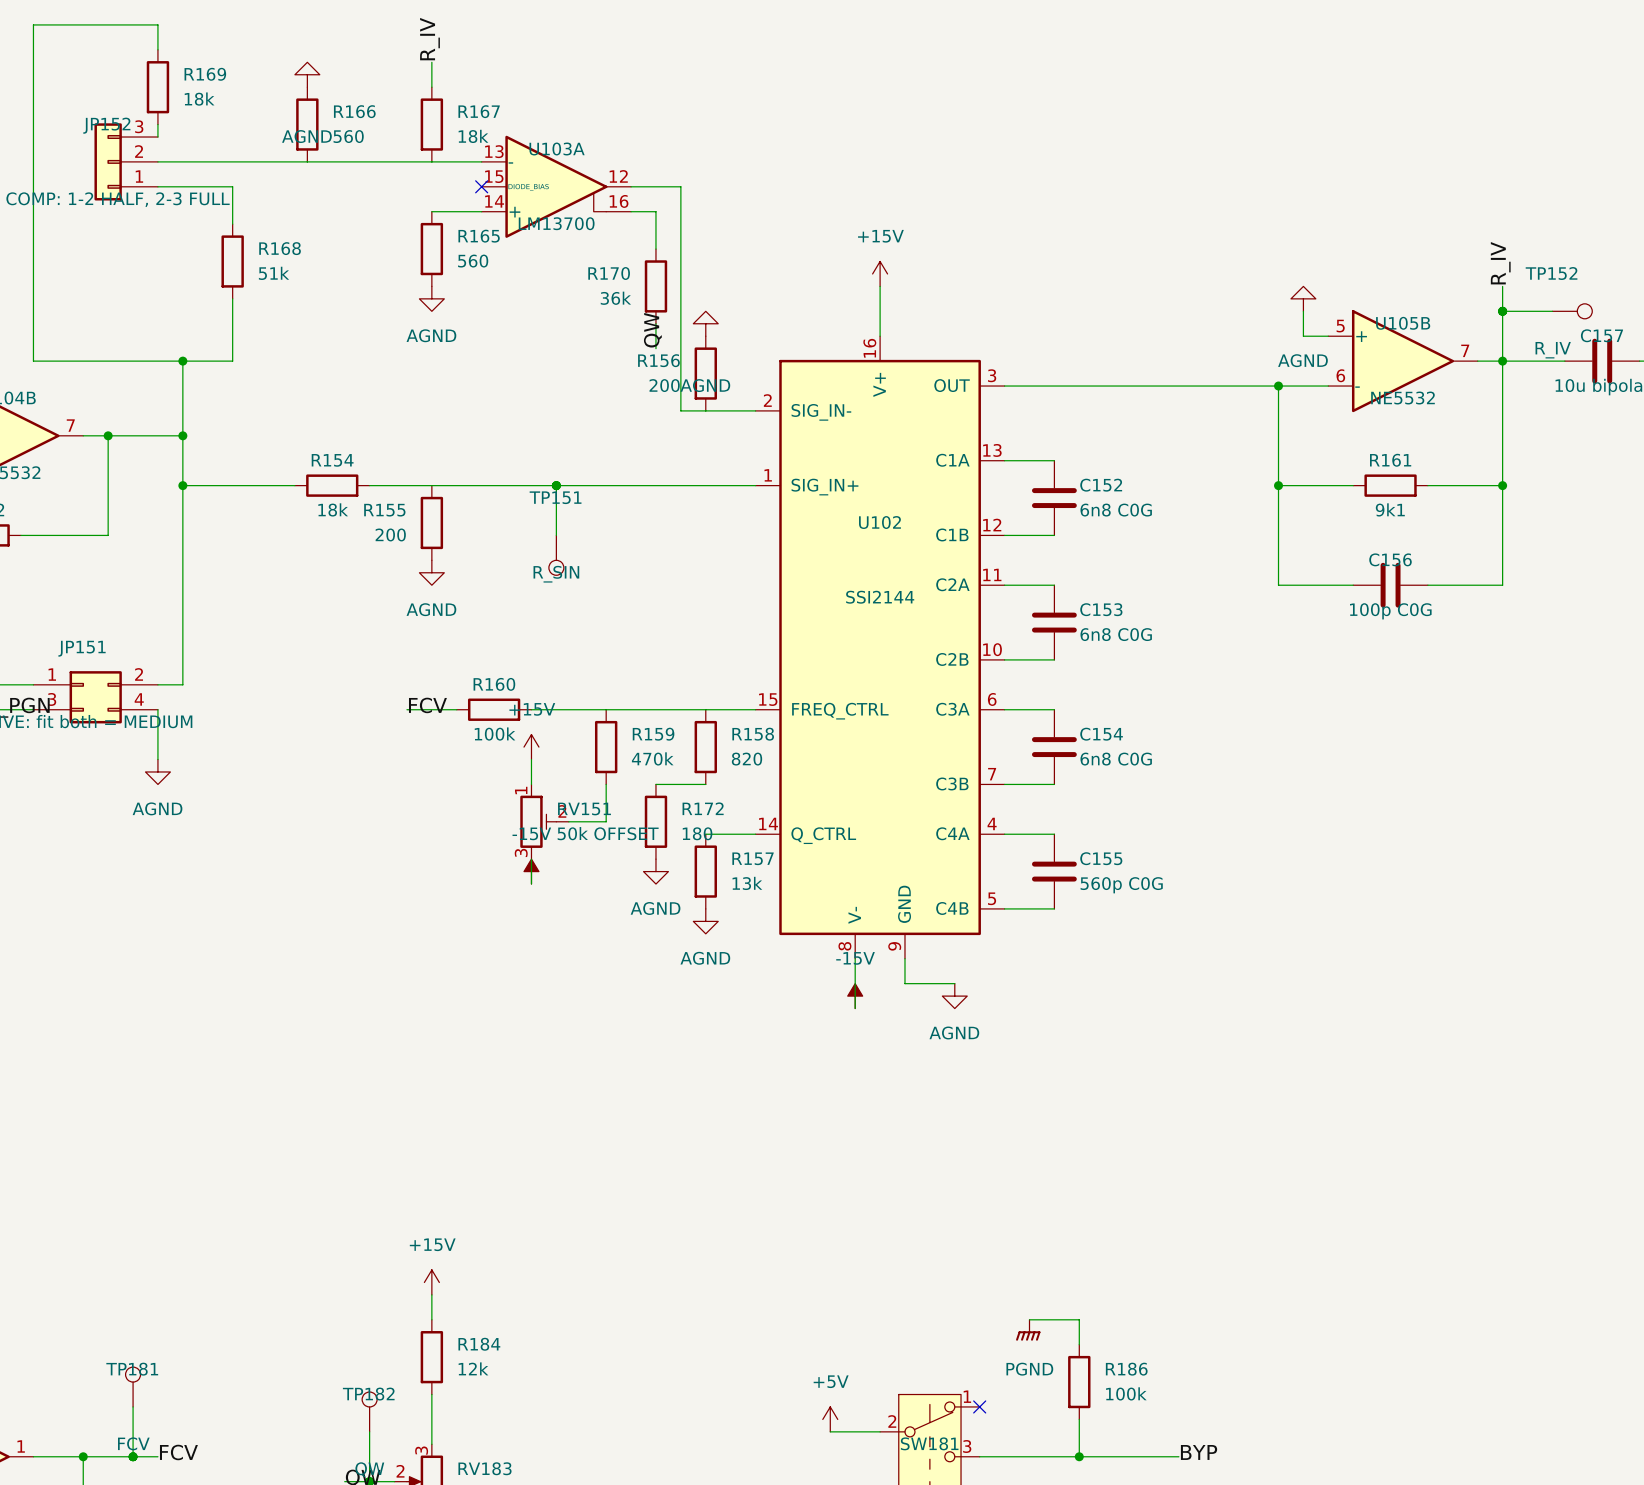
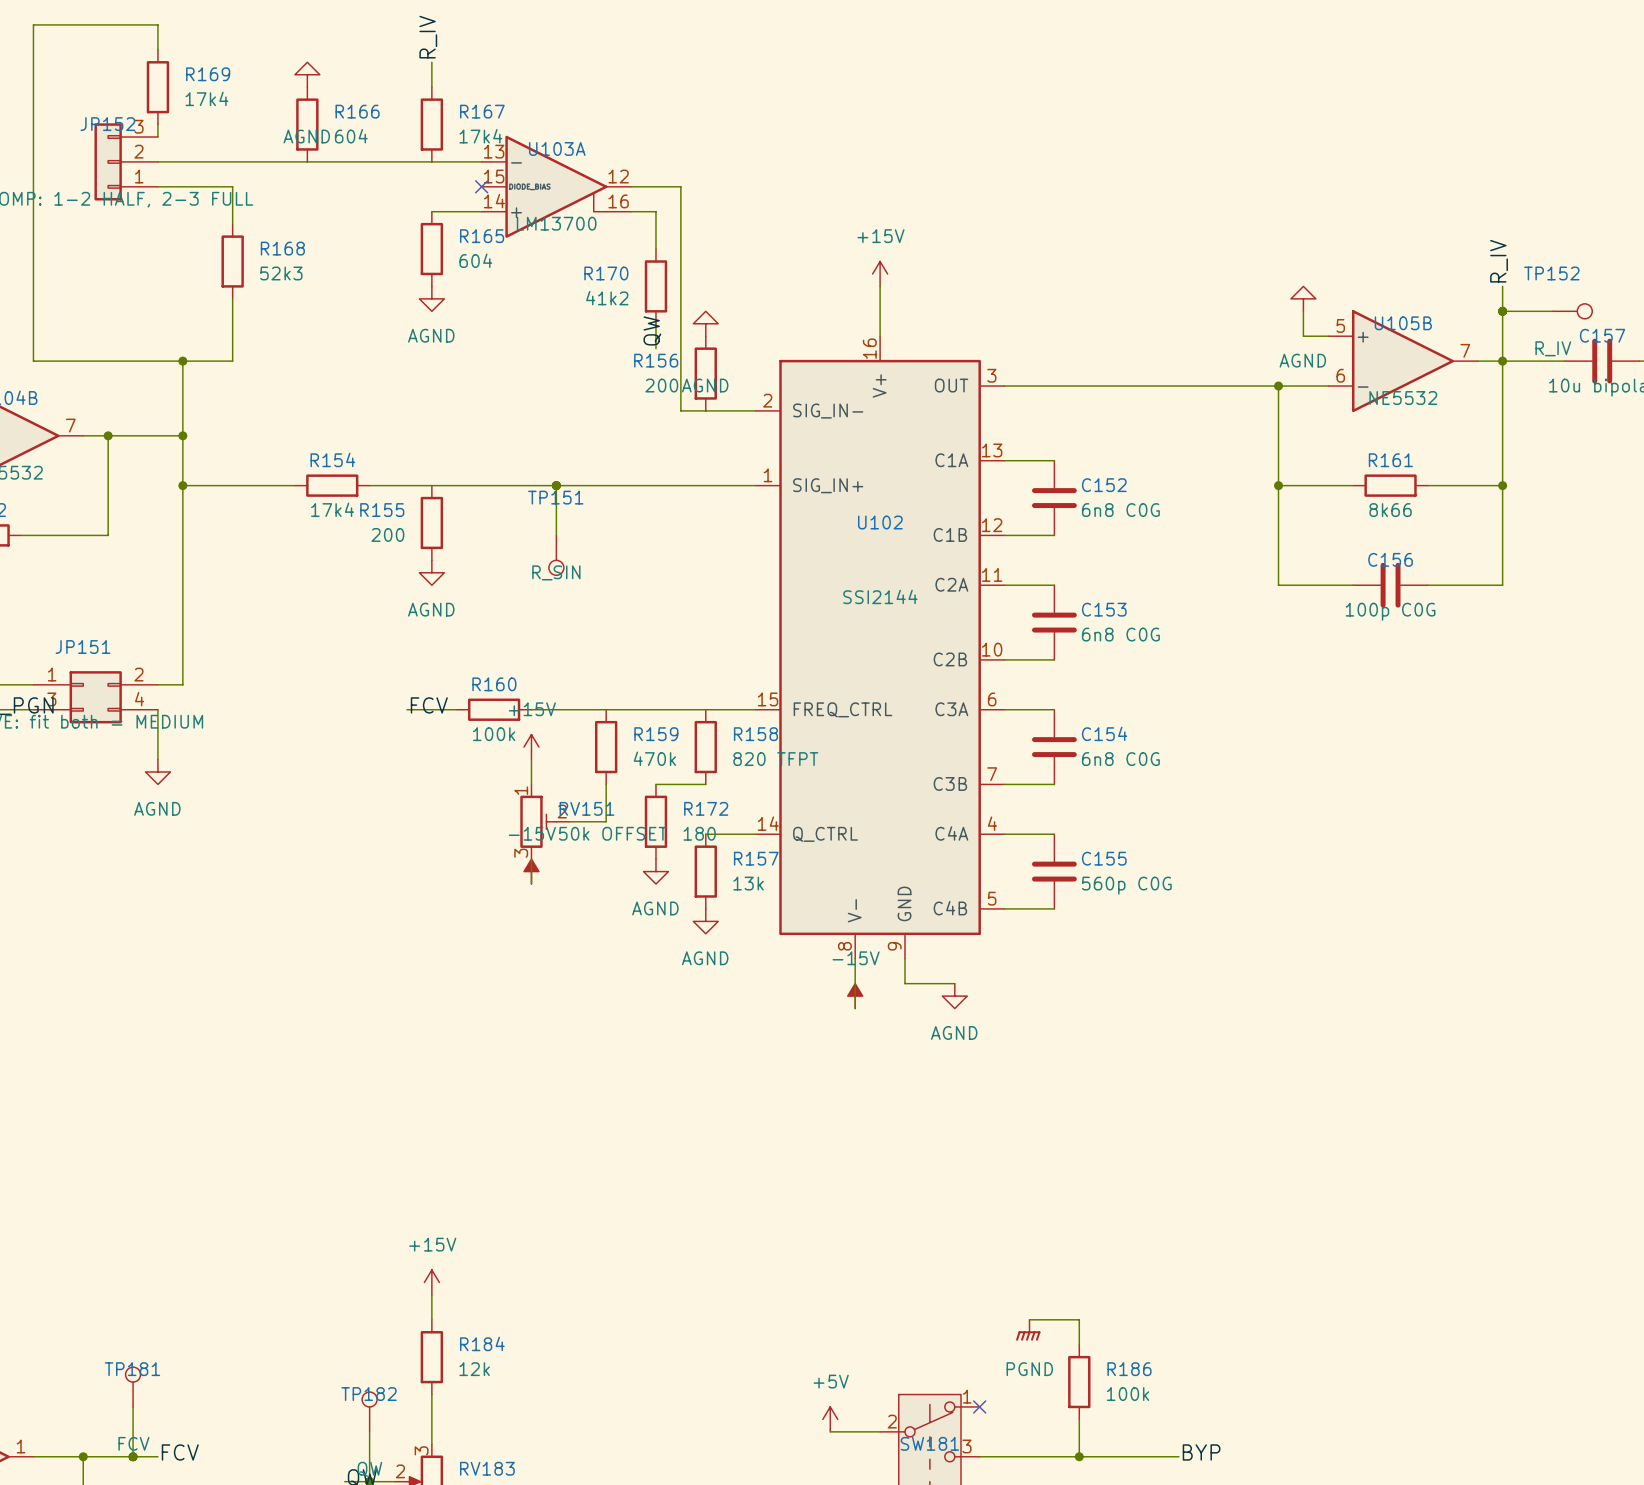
R169 value: 18k (199, 99) -> 17k4 (206, 98)
R166 value: 560 (348, 136) -> 604 (351, 136)
R167 value: 18k (473, 136) -> 17k4 (480, 136)
R165 value: 560 (473, 261) -> 604 (475, 260)
R168 value: 51k (274, 273) -> 52k3 (281, 273)
R170 value: 36k (615, 298) -> 41k2 (607, 298)
R154 value: 18k (333, 509) -> 17k4 (332, 509)
R161 value: 9k1 (1390, 509) -> 8k66 (1390, 510)
R158 value: 820 (746, 759) -> 820 TFPT (775, 759)

